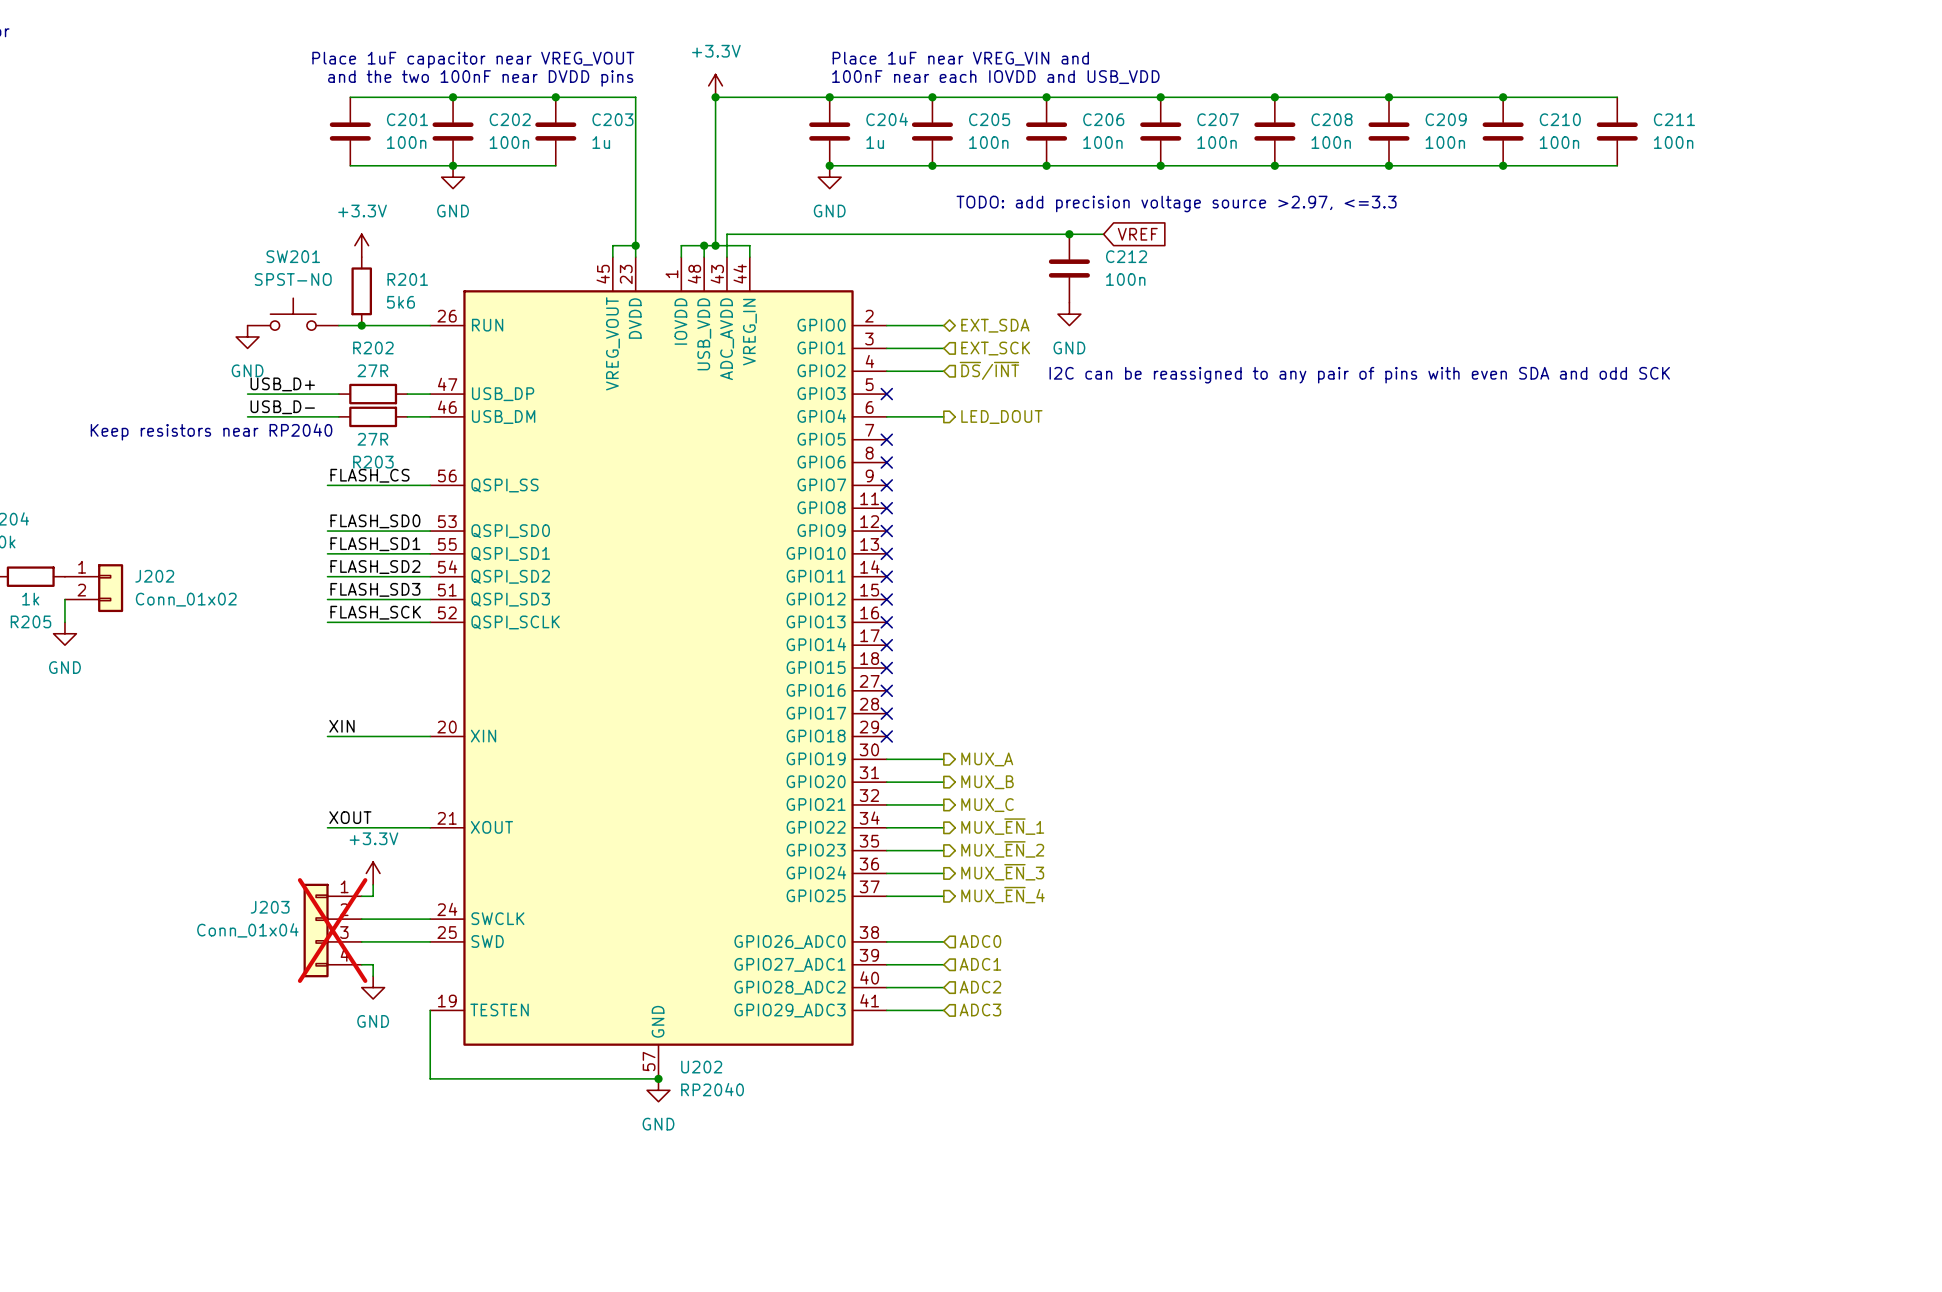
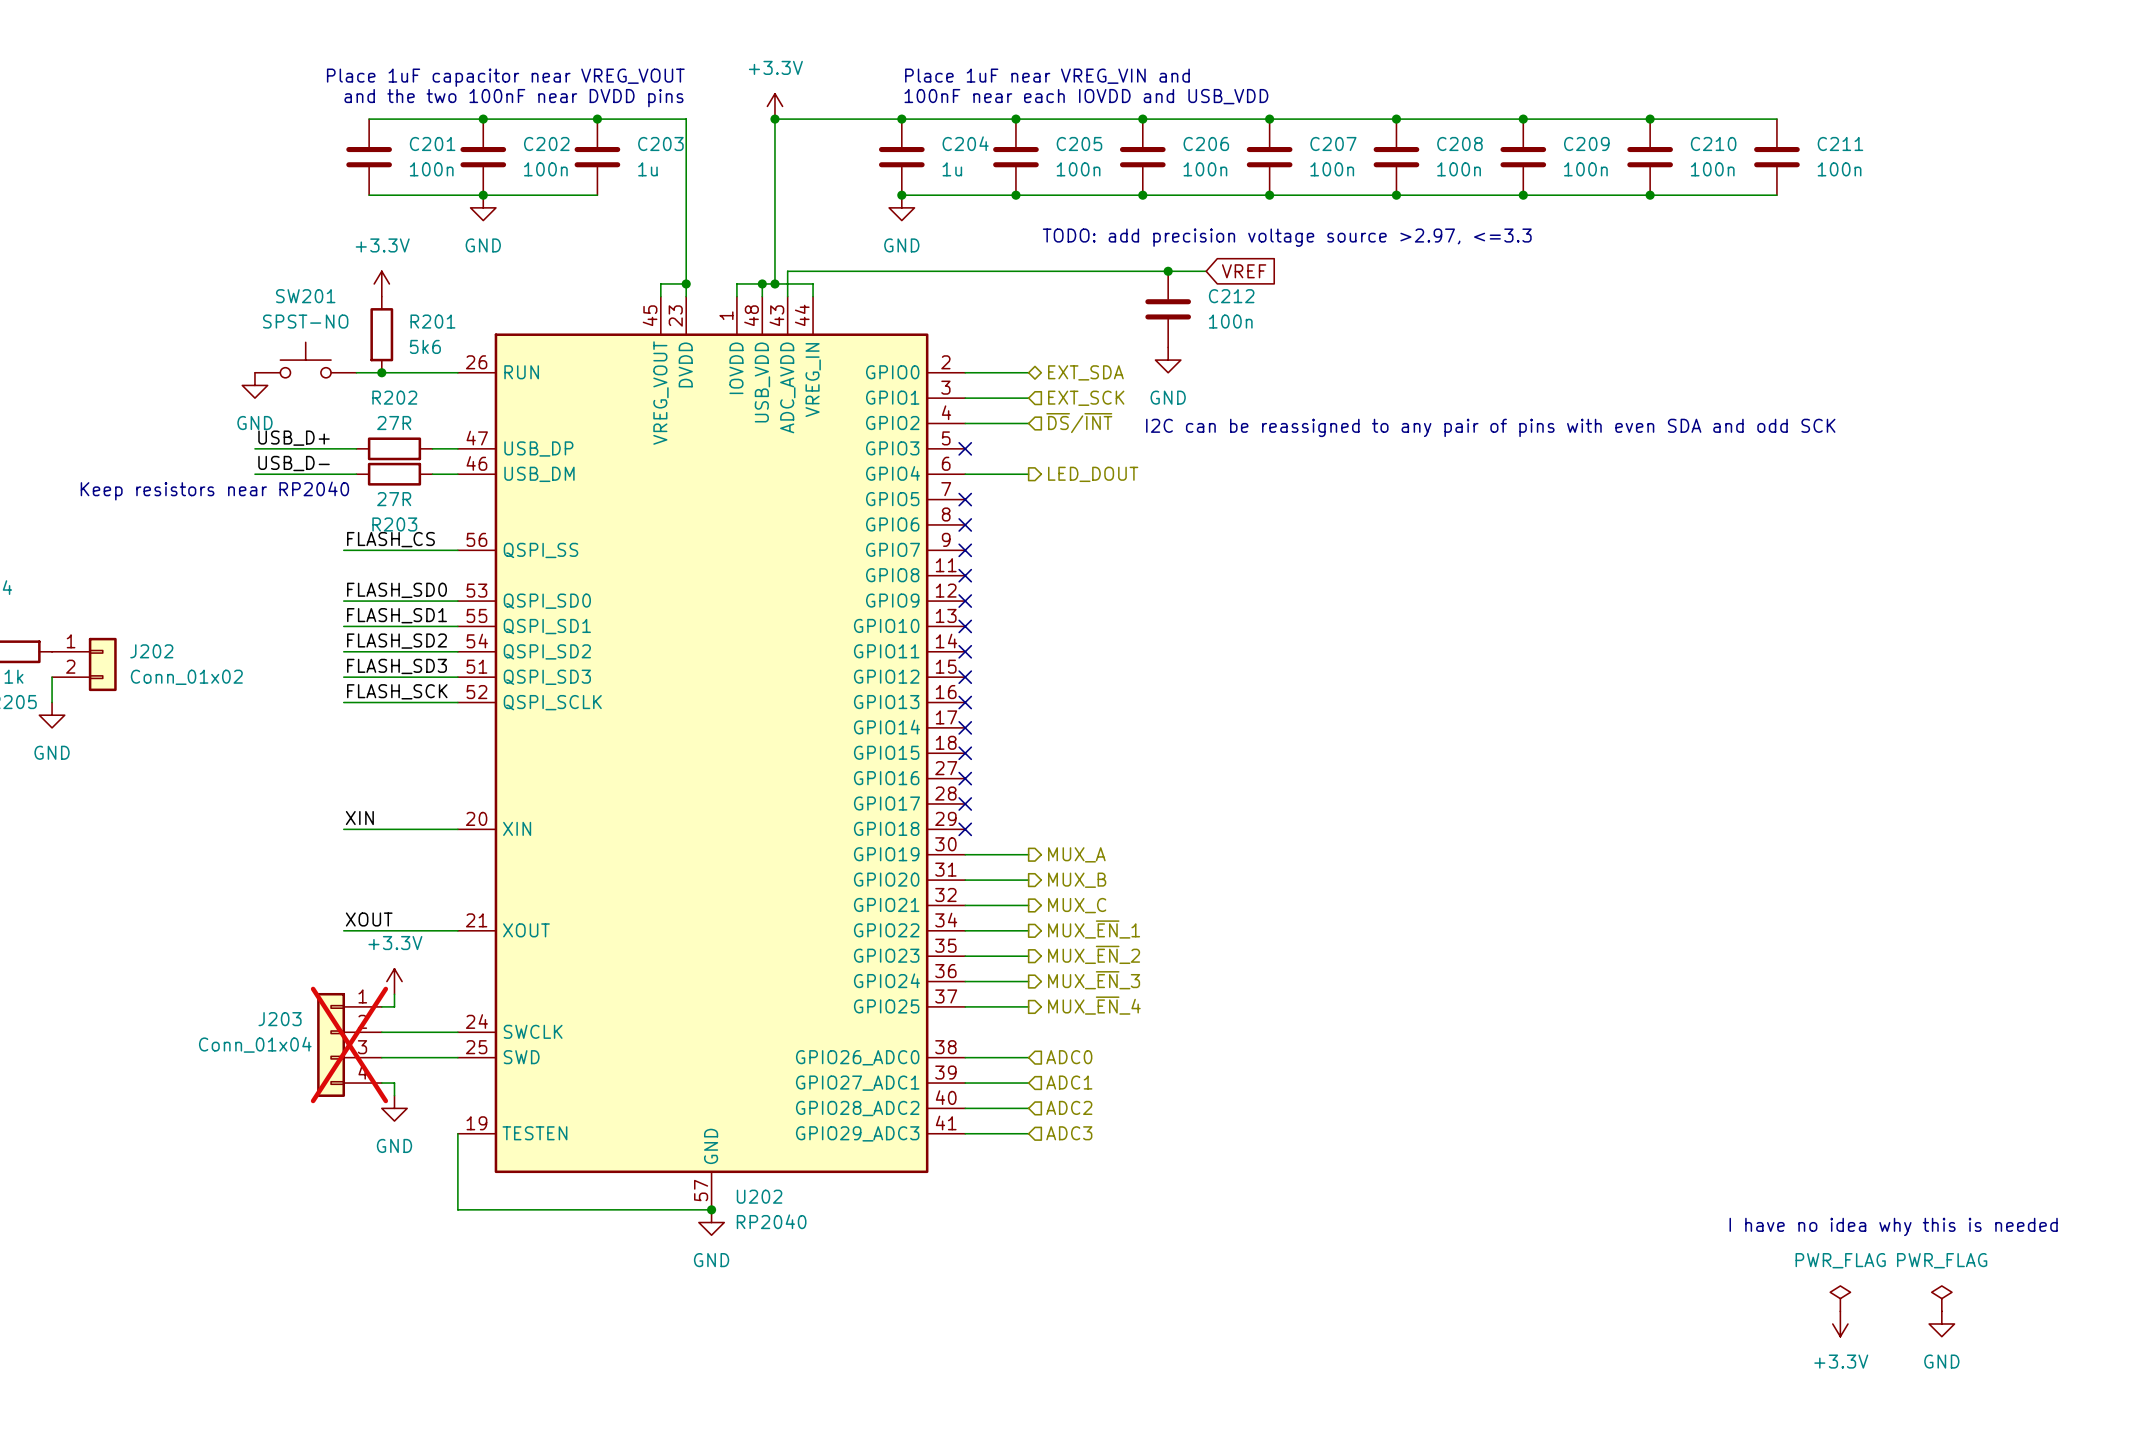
text: none -> I have no idea why this is needed (1893, 1226)
power symbol: none -> PWR_FLAG (1840, 1298)
power symbol: none -> PWR_FLAG (1941, 1298)
power symbol: none -> +3.3V (1840, 1324)
power symbol: none -> GND (1941, 1324)

